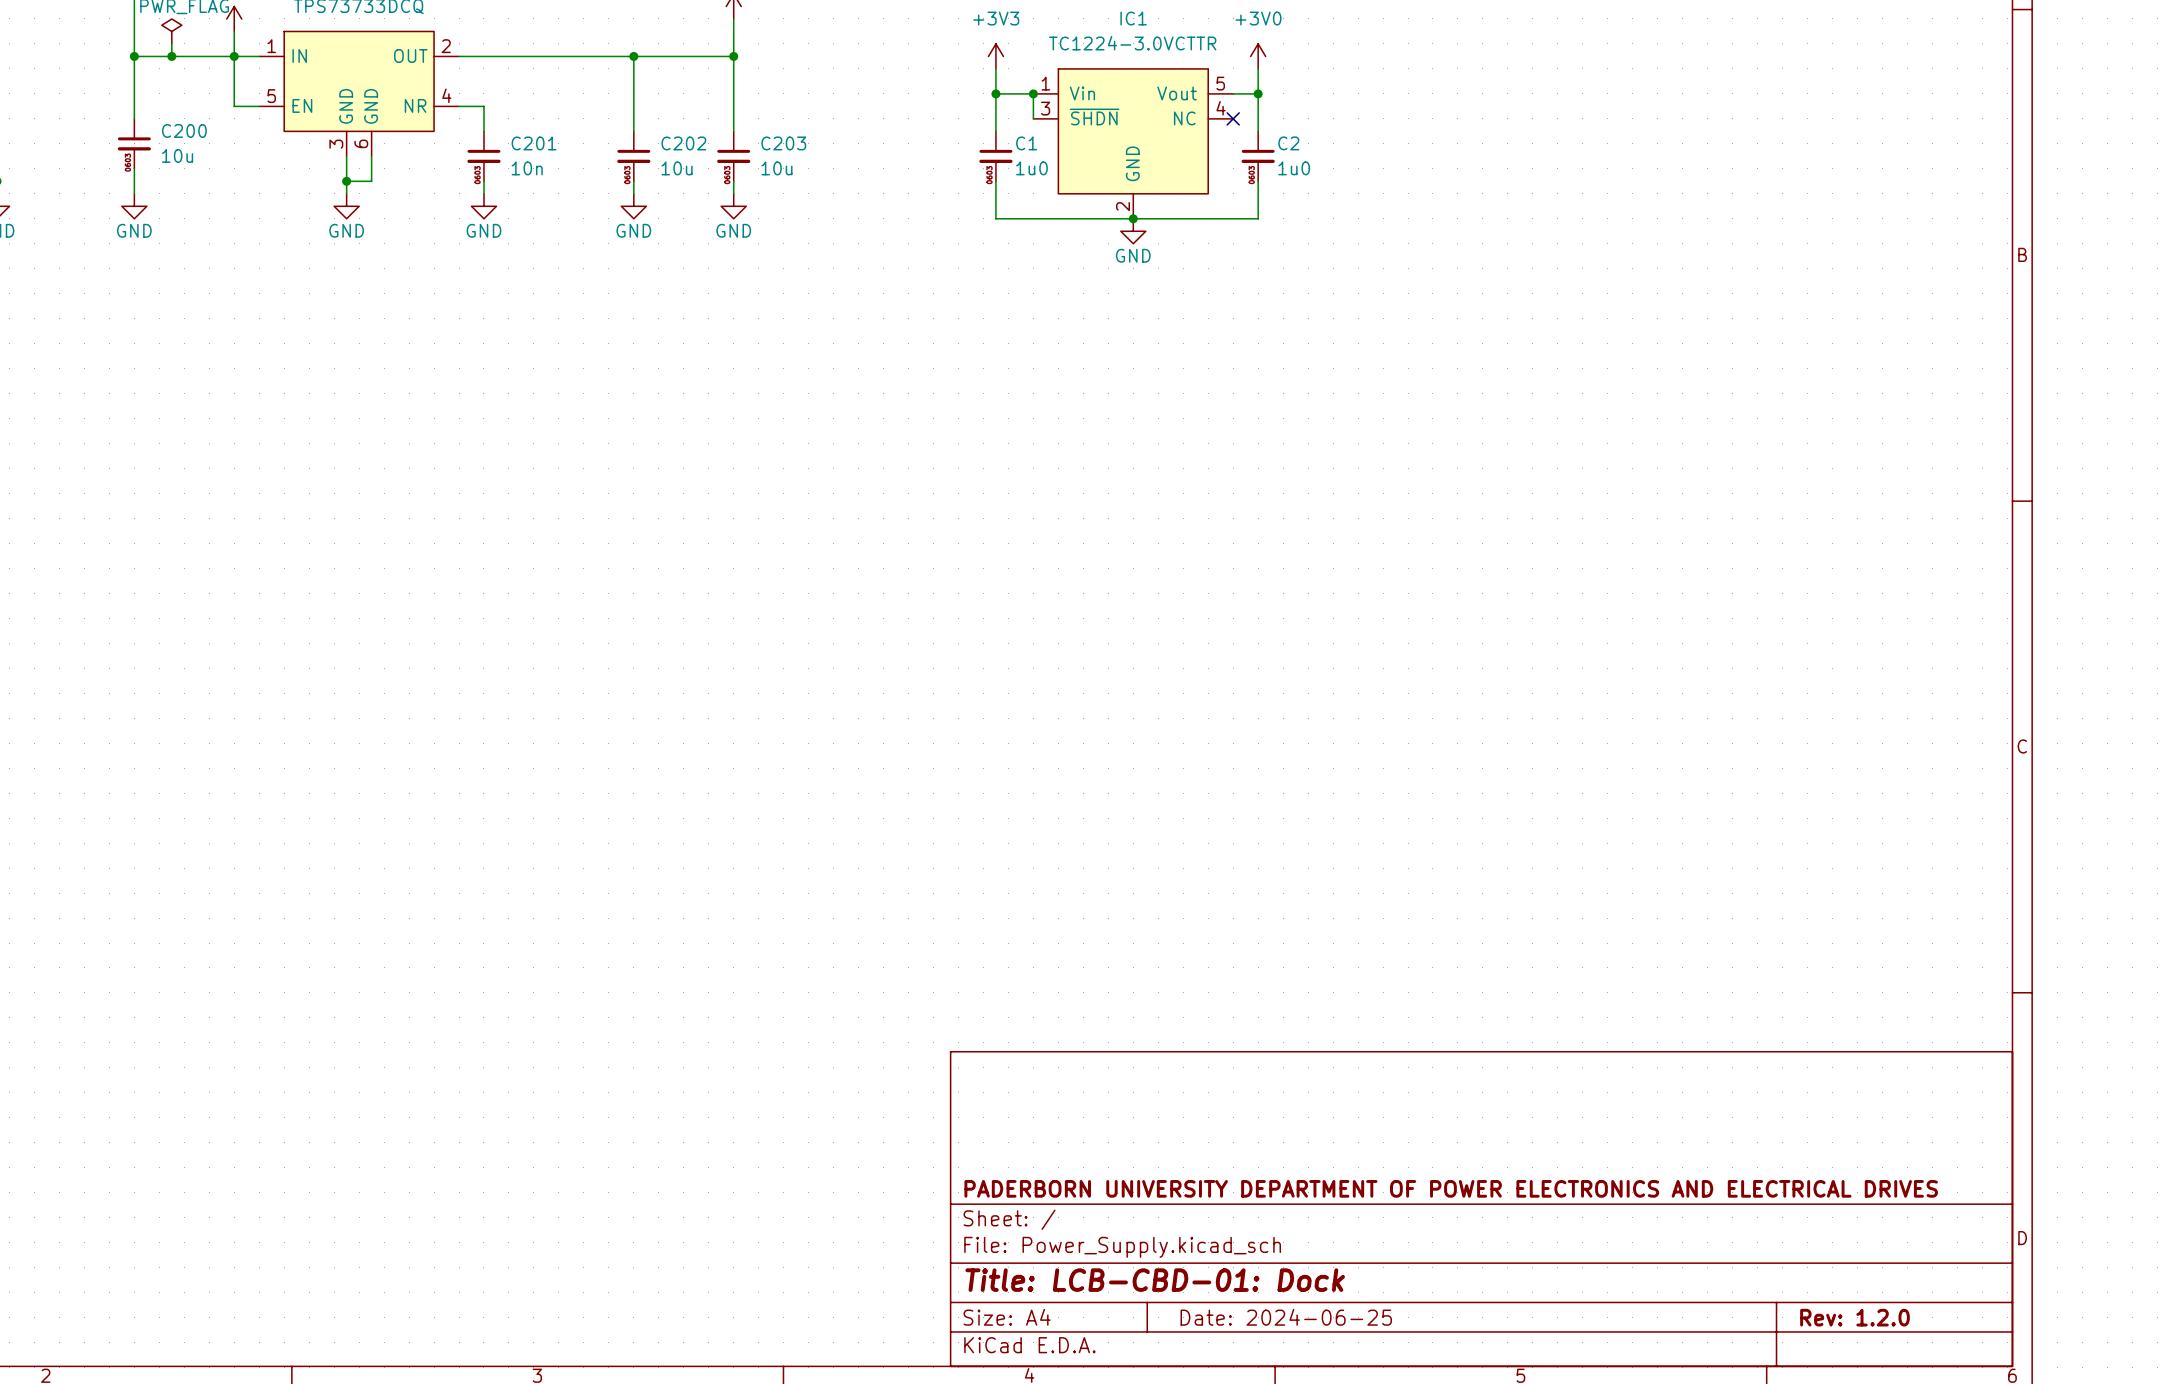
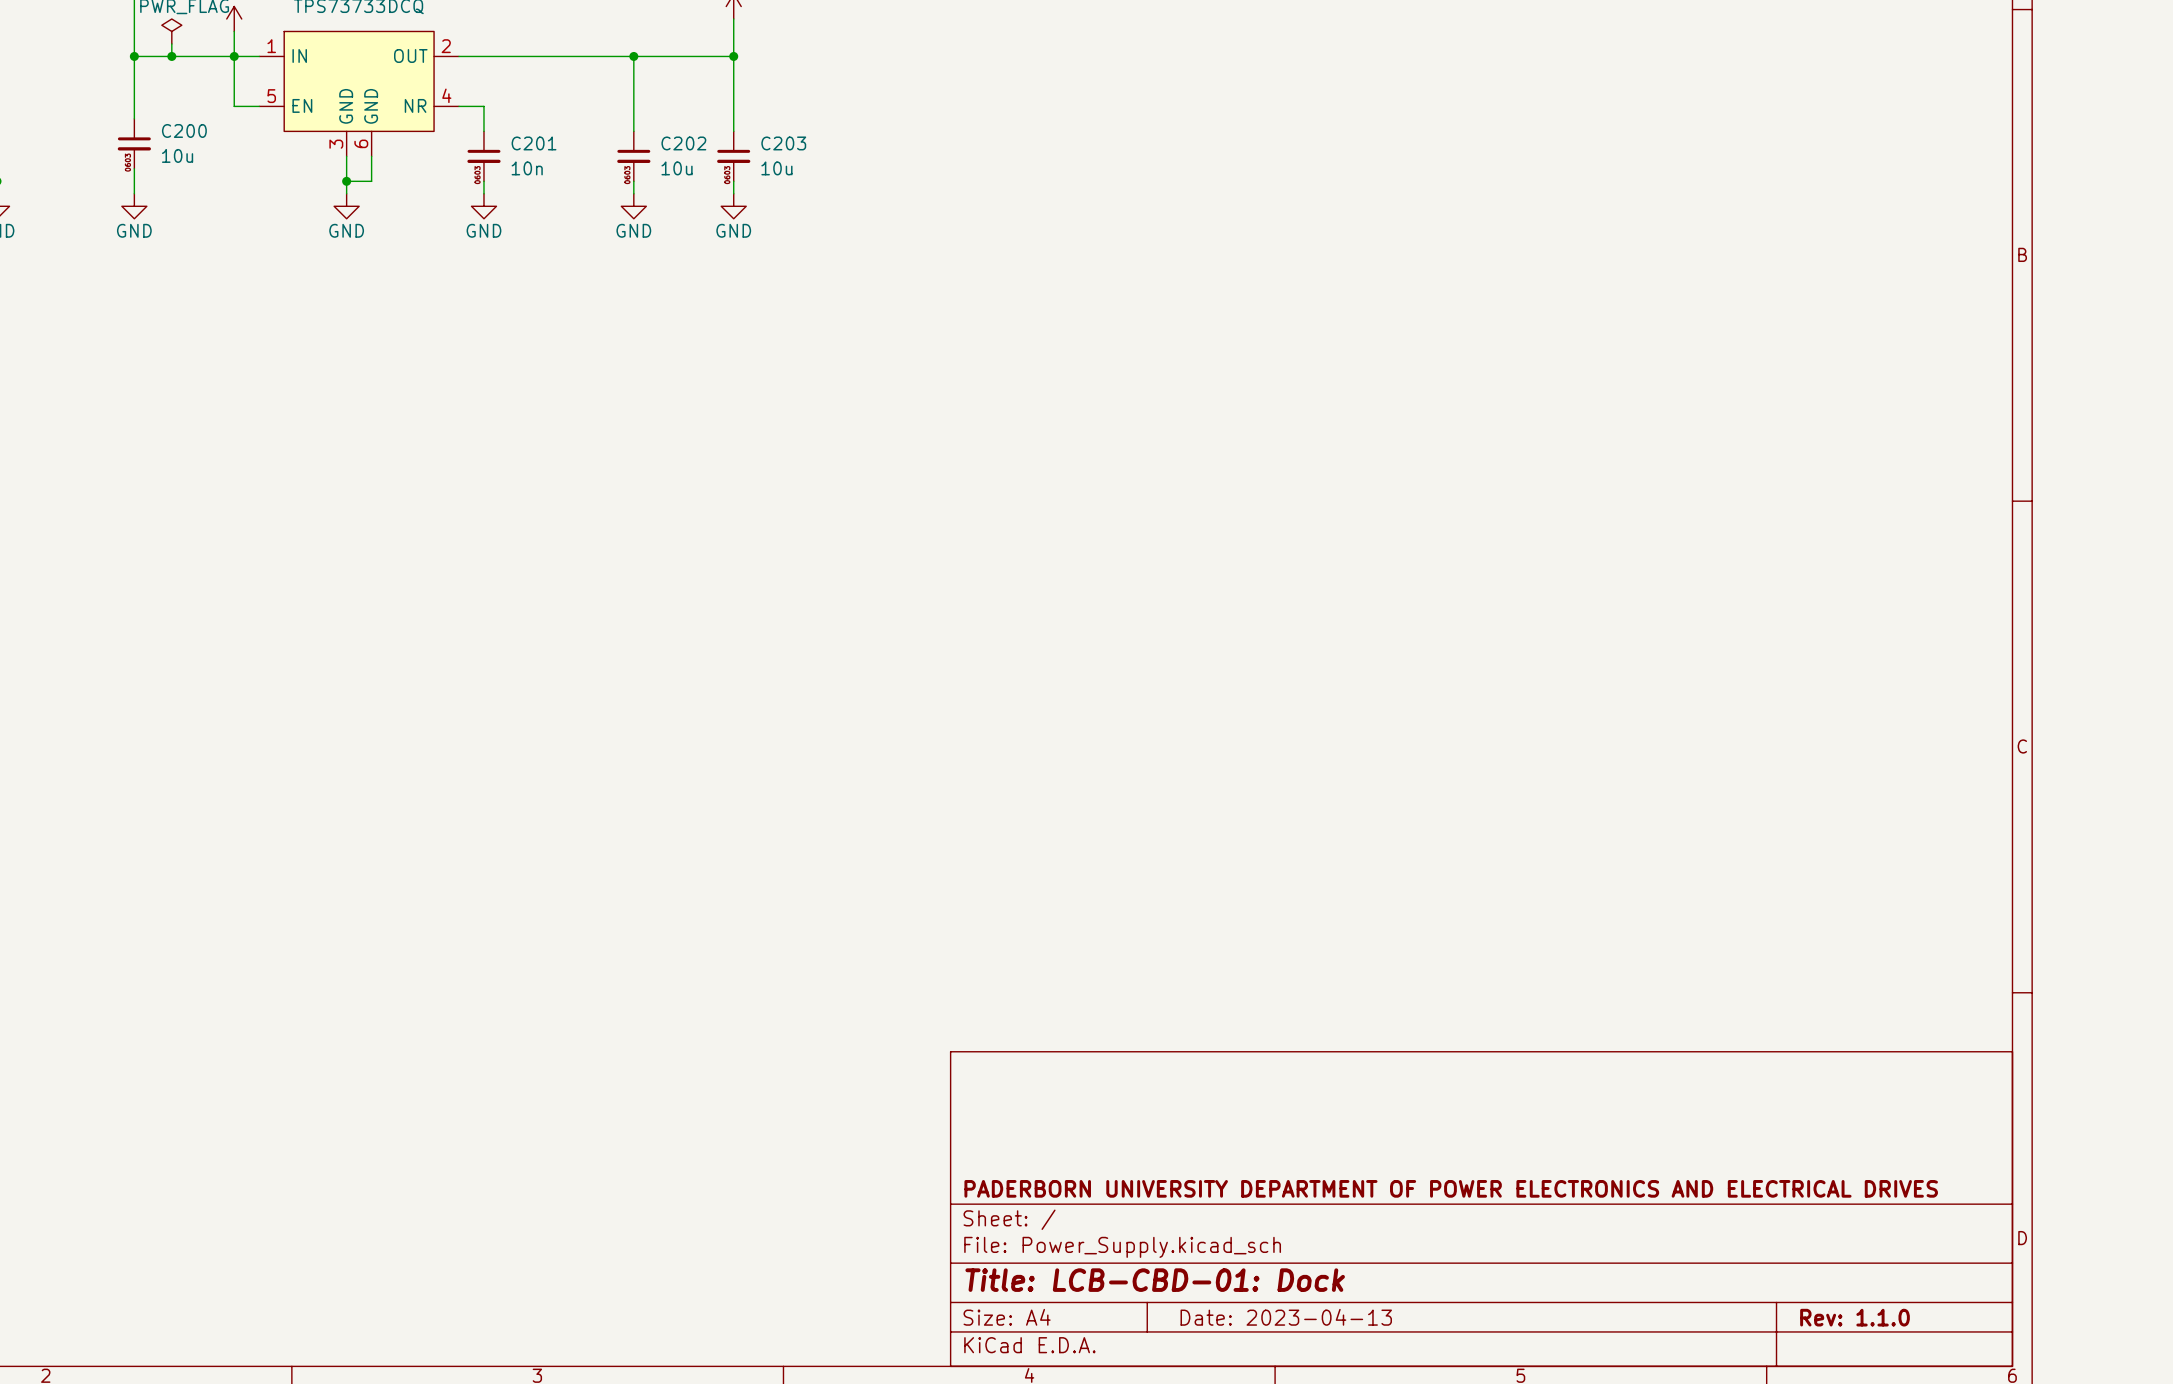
power symbol: +3V3 (995, 56) -> none
power symbol: +3V0 (1258, 56) -> none
wire: (995, 68) (995, 131) -> none
wire: (1258, 68) (1258, 131) -> none
wire: (995, 93) (1033, 93) (1033, 118) -> none
junction: (995, 93) -> none
junction: (1033, 93) -> none
wire: (1233, 93) (1258, 93) -> none
junction: (1258, 93) -> none
no-connect mark: (1233, 118) -> none
IC1: TC1224-3.0VCTTR (1133, 143) -> none
C1: 1u0 (995, 156) -> none
C2: 1u0 (1258, 156) -> none
wire: (995, 181) (995, 218) (1258, 218) (1258, 181) -> none
junction: (1133, 218) -> none
power symbol: GND (1133, 231) -> none
title block: Date: 2024-06-25 (1286, 1317) -> Date: 2023-04-13 (1286, 1317)
title block: Rev: 1.2.0 (1855, 1317) -> Rev: 1.1.0 (1855, 1317)

